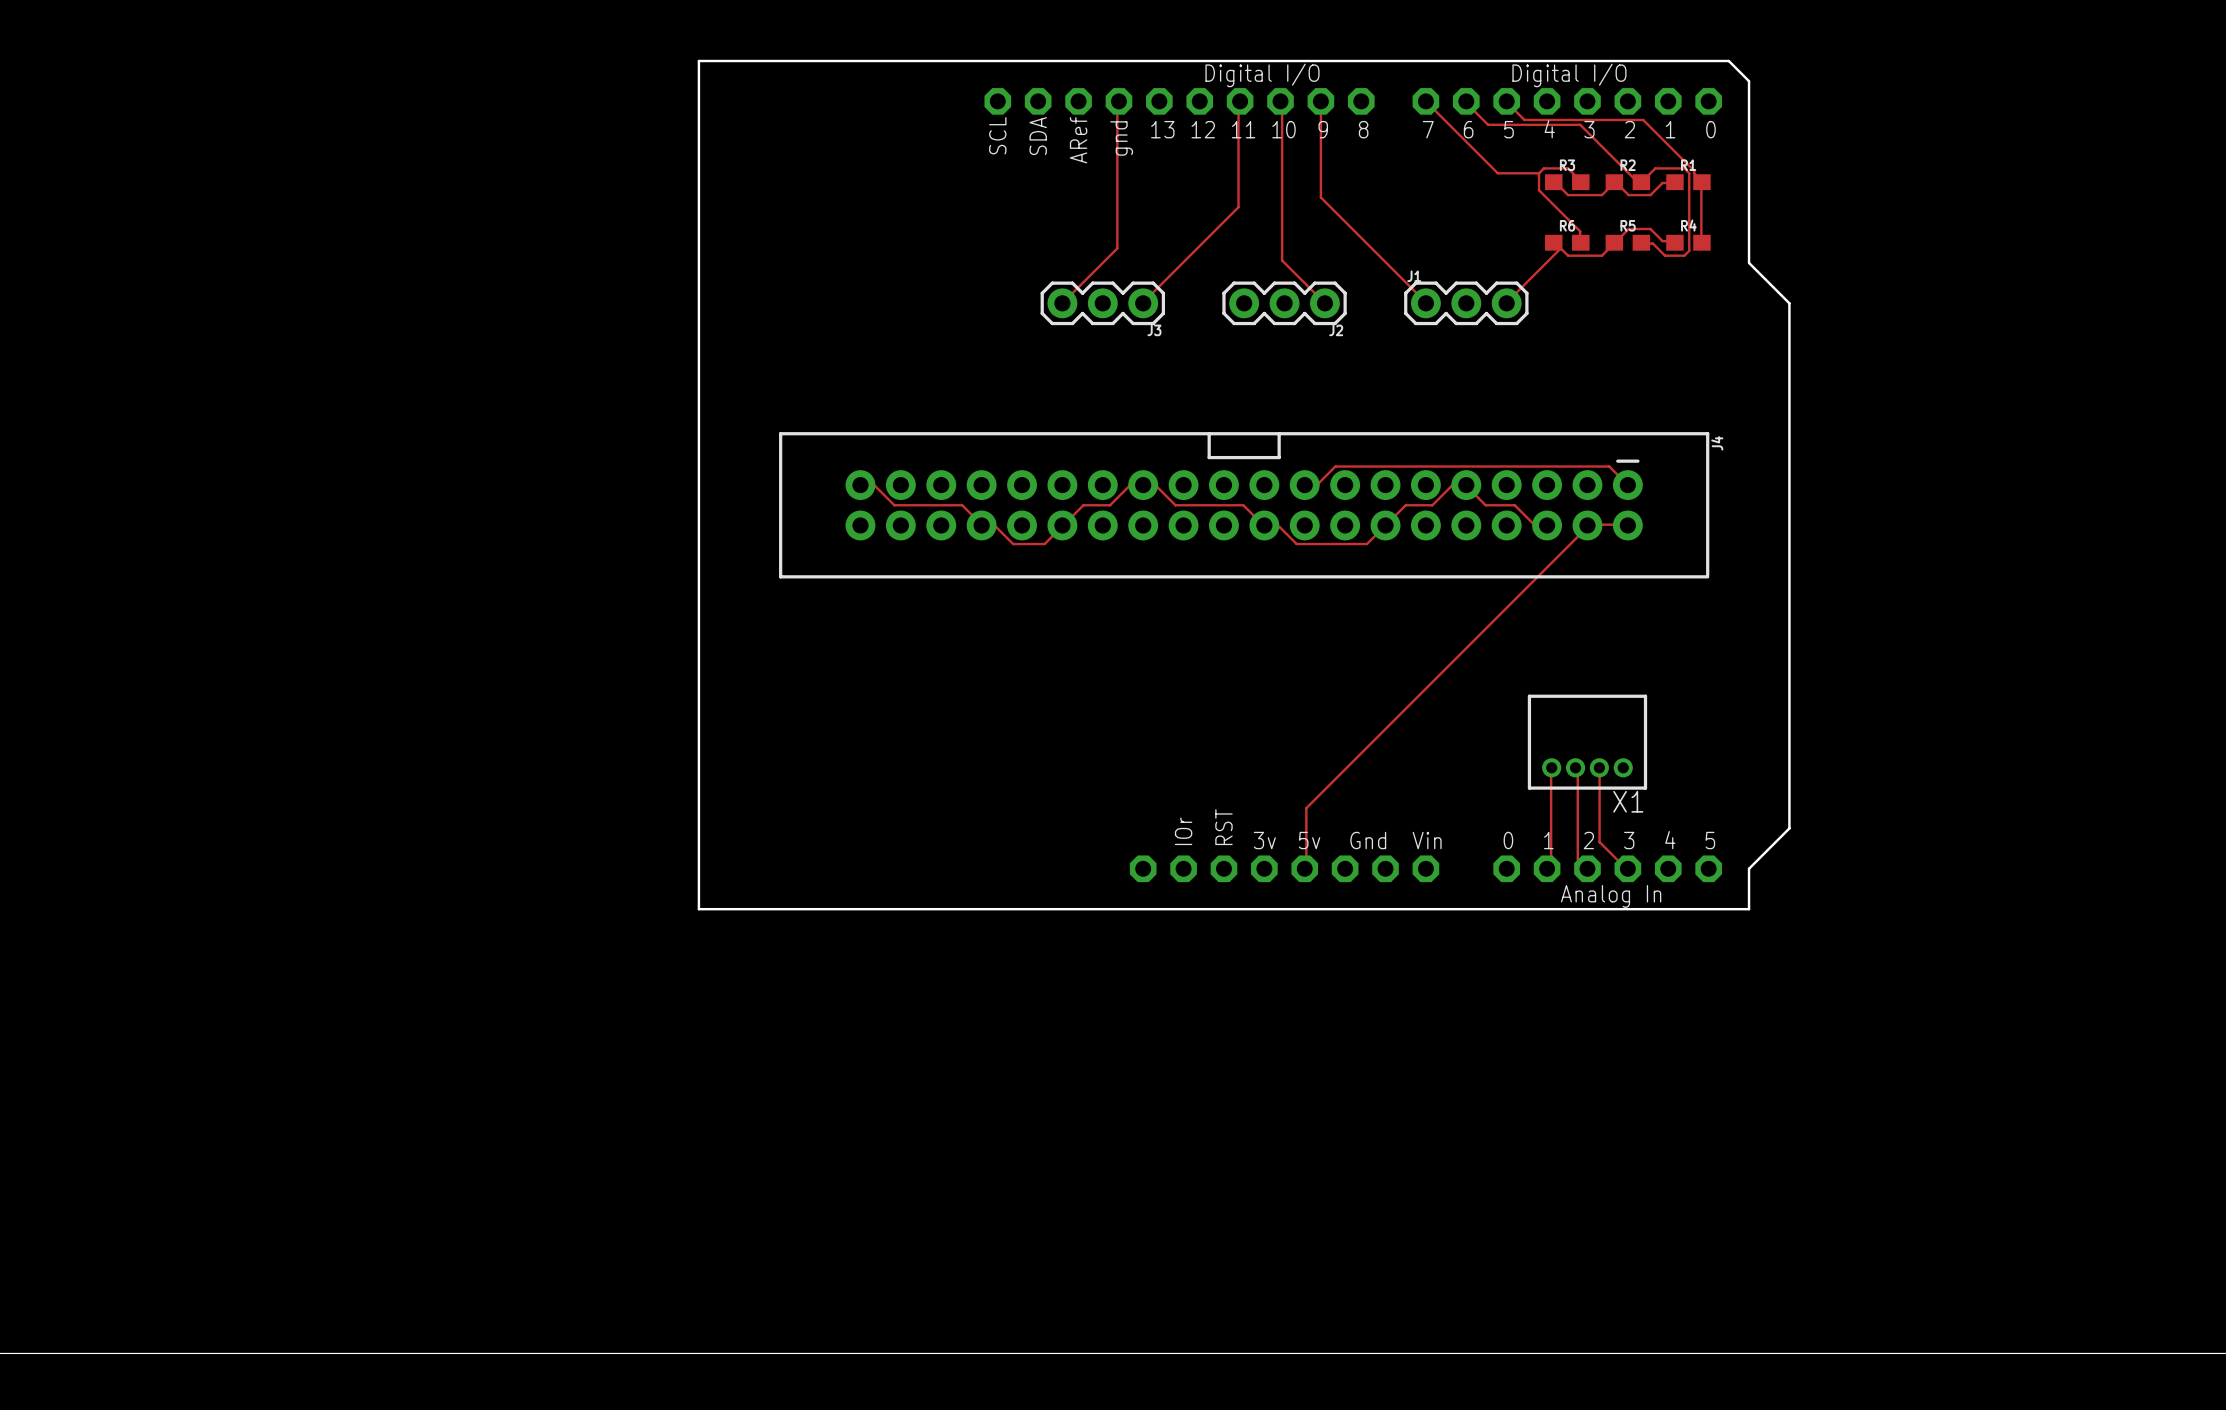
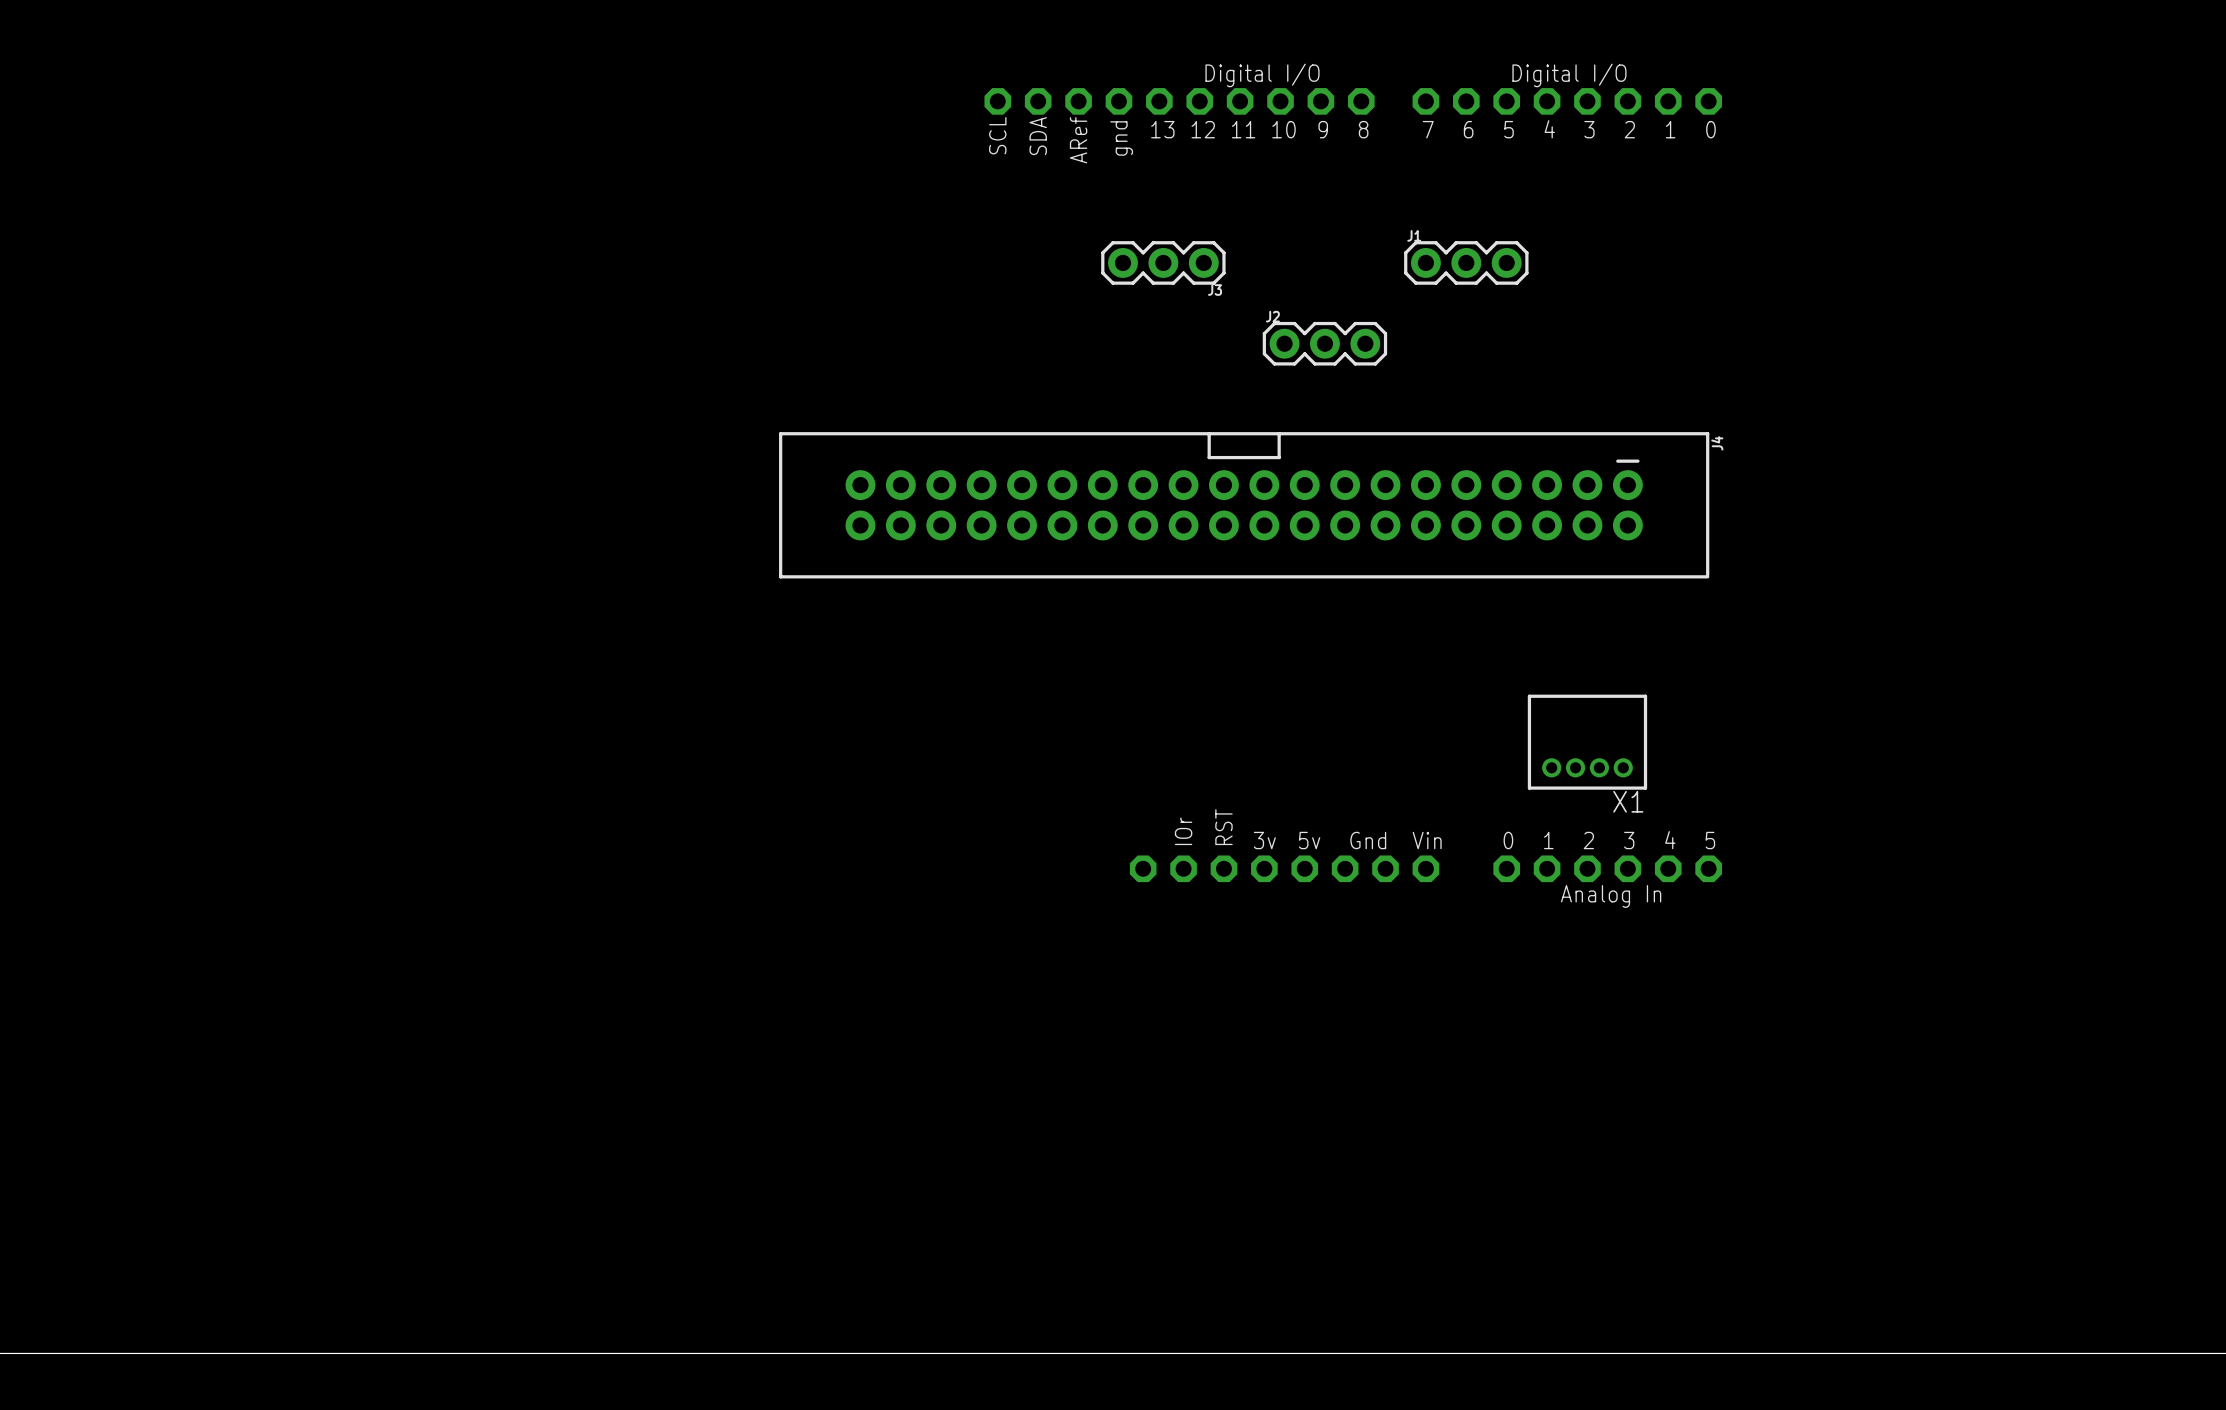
board edge: (698, 61) (698, 909) (1749, 909) (1749, 868) (1789, 828) (1789, 303) (1749, 262) (1749, 81) (1728, 61) (698, 61) -> none
track: (1118, 101) (1117, 103) (1117, 248) (1062, 303) -> none
track: (1240, 101) (1238, 103) (1238, 207) (1143, 303) -> none
track: (1280, 101) (1282, 103) (1282, 260) (1324, 303) -> none
track: (1320, 101) (1320, 197) (1425, 303) -> none
track: (1425, 101) (1497, 173) (1539, 173) -> none
track: (1466, 101) (1488, 124) (1580, 124) (1635, 180) (1641, 182) (1655, 168) (1684, 168) (1689, 173) (1689, 250) (1684, 255) (1665, 255) (1652, 243) (1641, 242) -> none
track: (1506, 101) (1524, 119) (1643, 119) (1701, 180) (1701, 242) -> none
track: (1539, 173) (1539, 190) (1580, 231) (1580, 242) -> none
track: (1539, 173) (1543, 168) (1568, 168) (1580, 182) -> none
track: (1553, 182) (1568, 195) (1602, 195) (1614, 182) (1628, 195) (1650, 195) (1662, 182) (1674, 182) -> none
R3: (1567, 182) -> none
R2: (1627, 182) -> none
R1: (1688, 182) -> none
R6: (1567, 242) -> none
R5: (1627, 242) -> none
track: (1674, 242) (1674, 241) (1662, 241) (1650, 229) (1628, 229) (1602, 255) (1568, 255) (1555, 243) (1553, 242) (1560, 248) (1507, 301) (1506, 303) -> none
R4: (1688, 242) -> none
J3 position: (1102, 303) -> (1163, 262)
J2 position: (1284, 303) -> (1324, 343)
J1 position: (1466, 303) -> (1466, 262)
J2 name position: J2 (1336, 330) -> J2 (1272, 316)
track: (860, 485) (875, 485) (894, 505) (962, 505) (981, 524) (981, 527) (996, 527) (1013, 544) (1044, 544) (1083, 505) (1110, 505) (1129, 485) (1143, 485) (1156, 485) (1175, 505) (1243, 505) (1265, 527) (1279, 527) (1296, 544) (1366, 544) (1405, 505) (1432, 505) (1451, 485) (1466, 485) -> none
track: (1304, 485) (1318, 483) (1335, 466) (1609, 466) (1627, 485) -> none
track: (1466, 485) (1485, 505) (1514, 505) (1534, 524) (1547, 525) -> none
track: (1627, 525) (1587, 524) (1587, 527) (1306, 808) (1306, 868) (1304, 868) -> none
track: (1551, 767) (1551, 866) (1547, 868) -> none
track: (1575, 767) (1577, 769) (1577, 859) (1587, 868) -> none
track: (1599, 767) (1599, 842) (1627, 868) -> none

